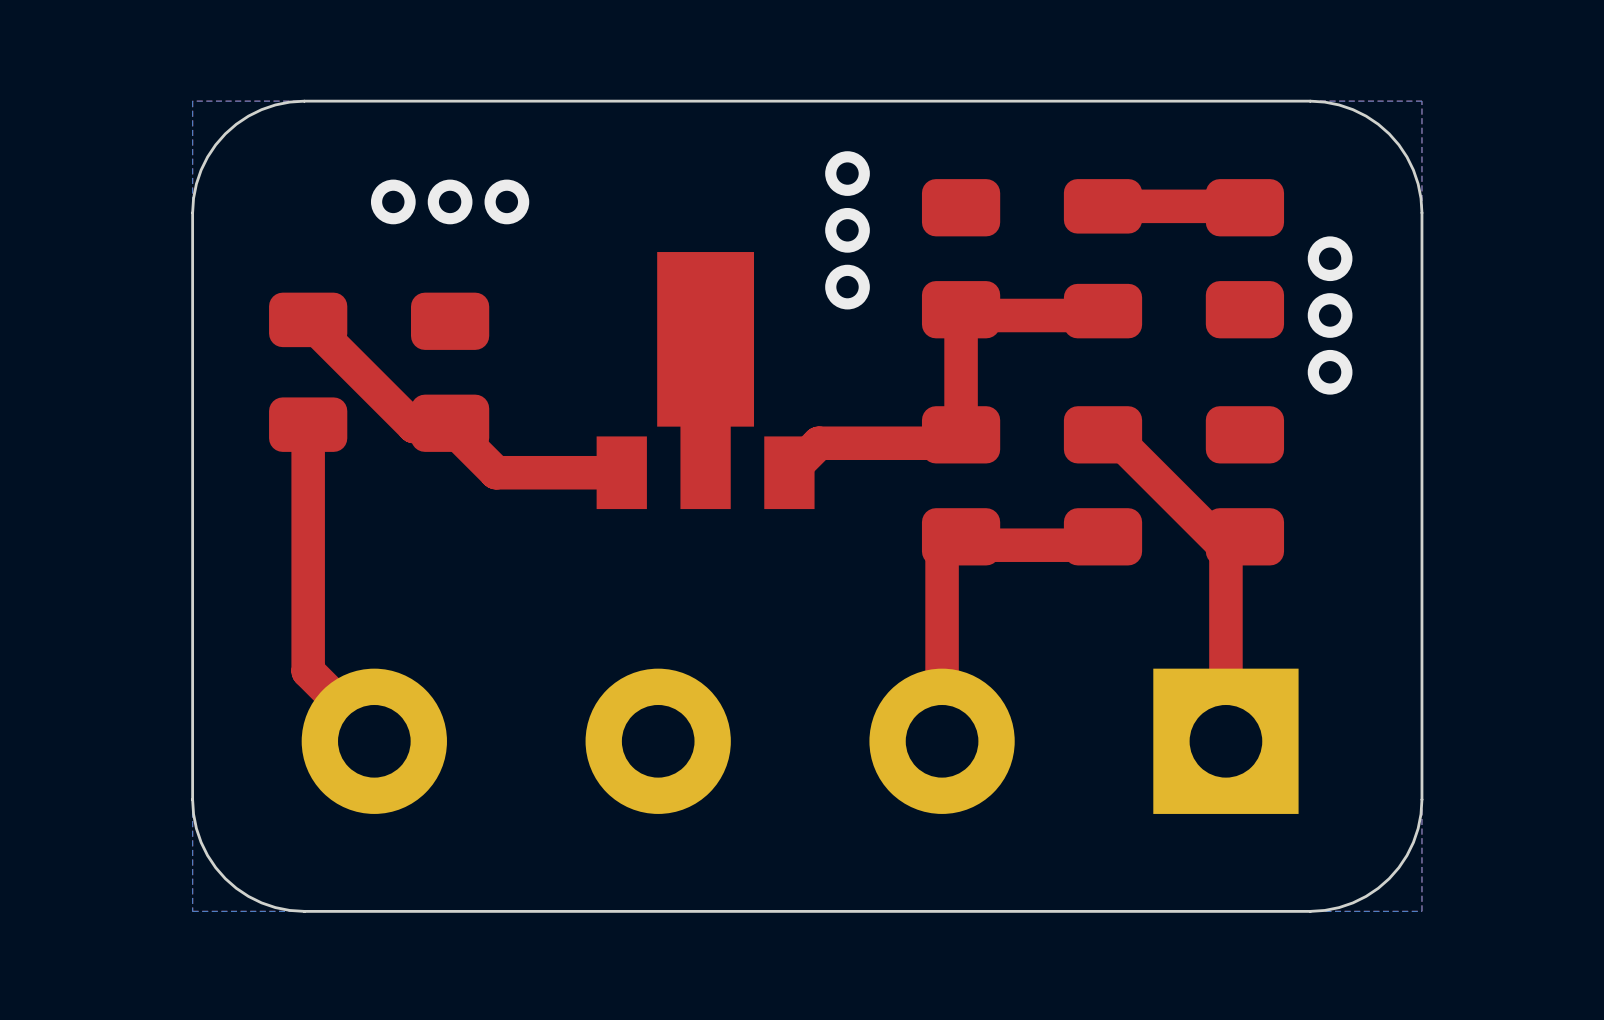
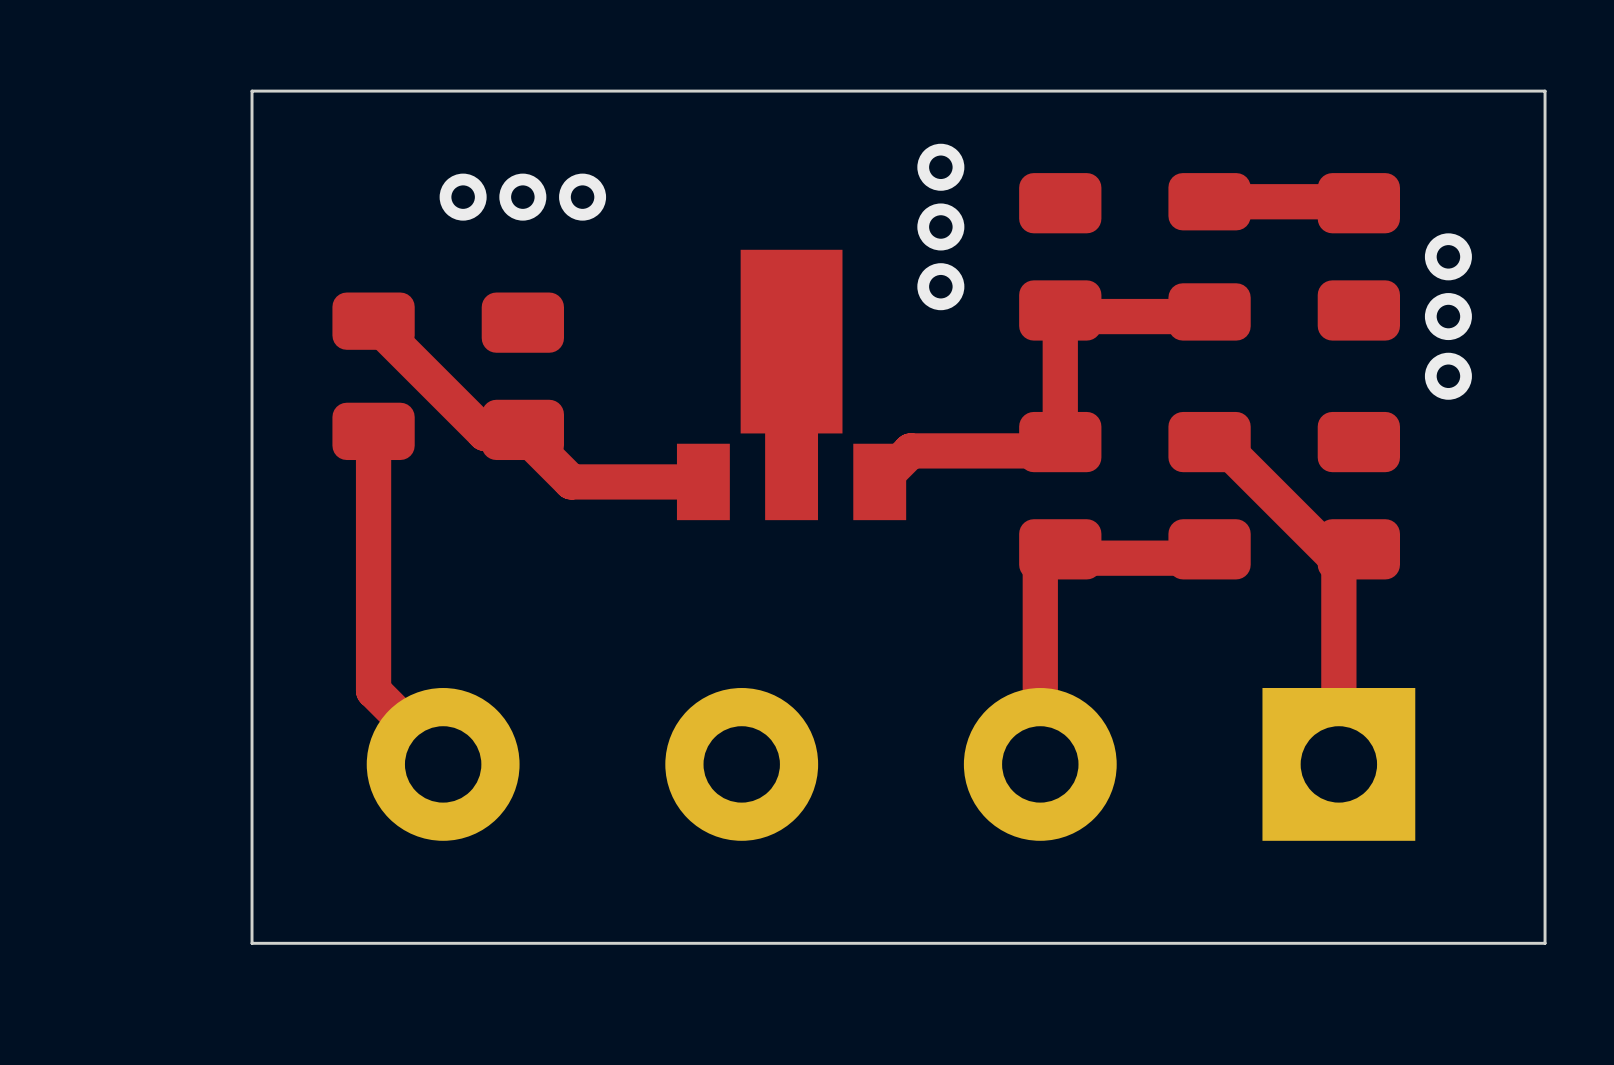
board edge: (304, 101) (275, 104) (261, 109) (248, 116) (225, 133) (215, 144) (201, 170) (193, 198) (192, 212) -> (369, 91) (252, 91) (252, 208)
board edge: (1310, 101) (1339, 104) (1352, 109) (1366, 116) (1389, 133) (1398, 144) (1413, 170) (1421, 198) (1421, 212) -> (1427, 91) (1545, 91) (1545, 208)
board edge: (192, 799) (193, 814) (201, 842) (215, 867) (225, 878) (248, 896) (261, 902) (275, 907) (304, 911) -> (252, 825) (252, 943) (369, 943)
board edge: (1421, 799) (1421, 814) (1413, 842) (1398, 867) (1389, 878) (1366, 896) (1352, 902) (1339, 907) (1310, 911) -> (1545, 825) (1545, 943) (1427, 943)

